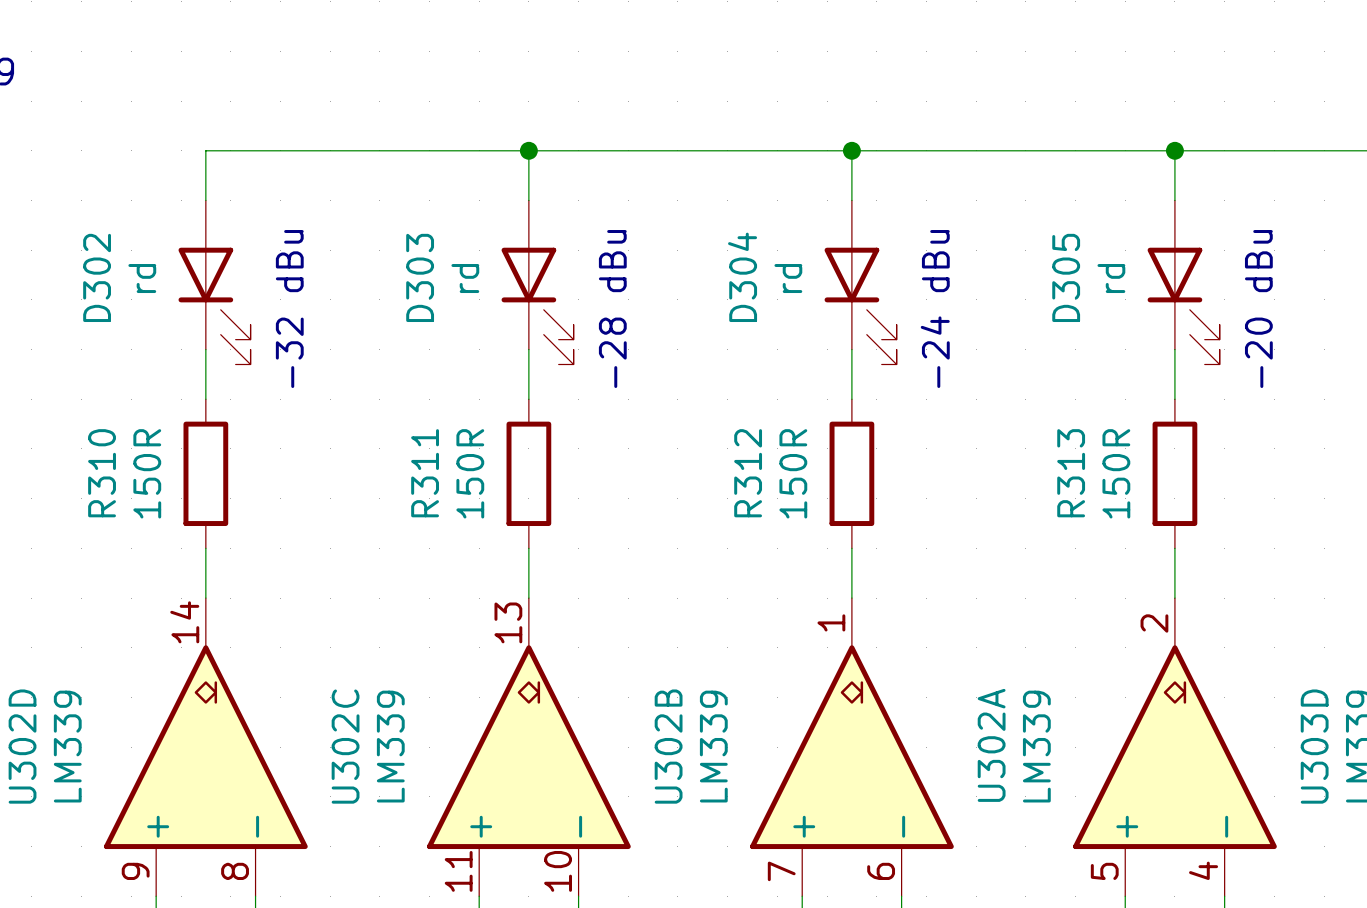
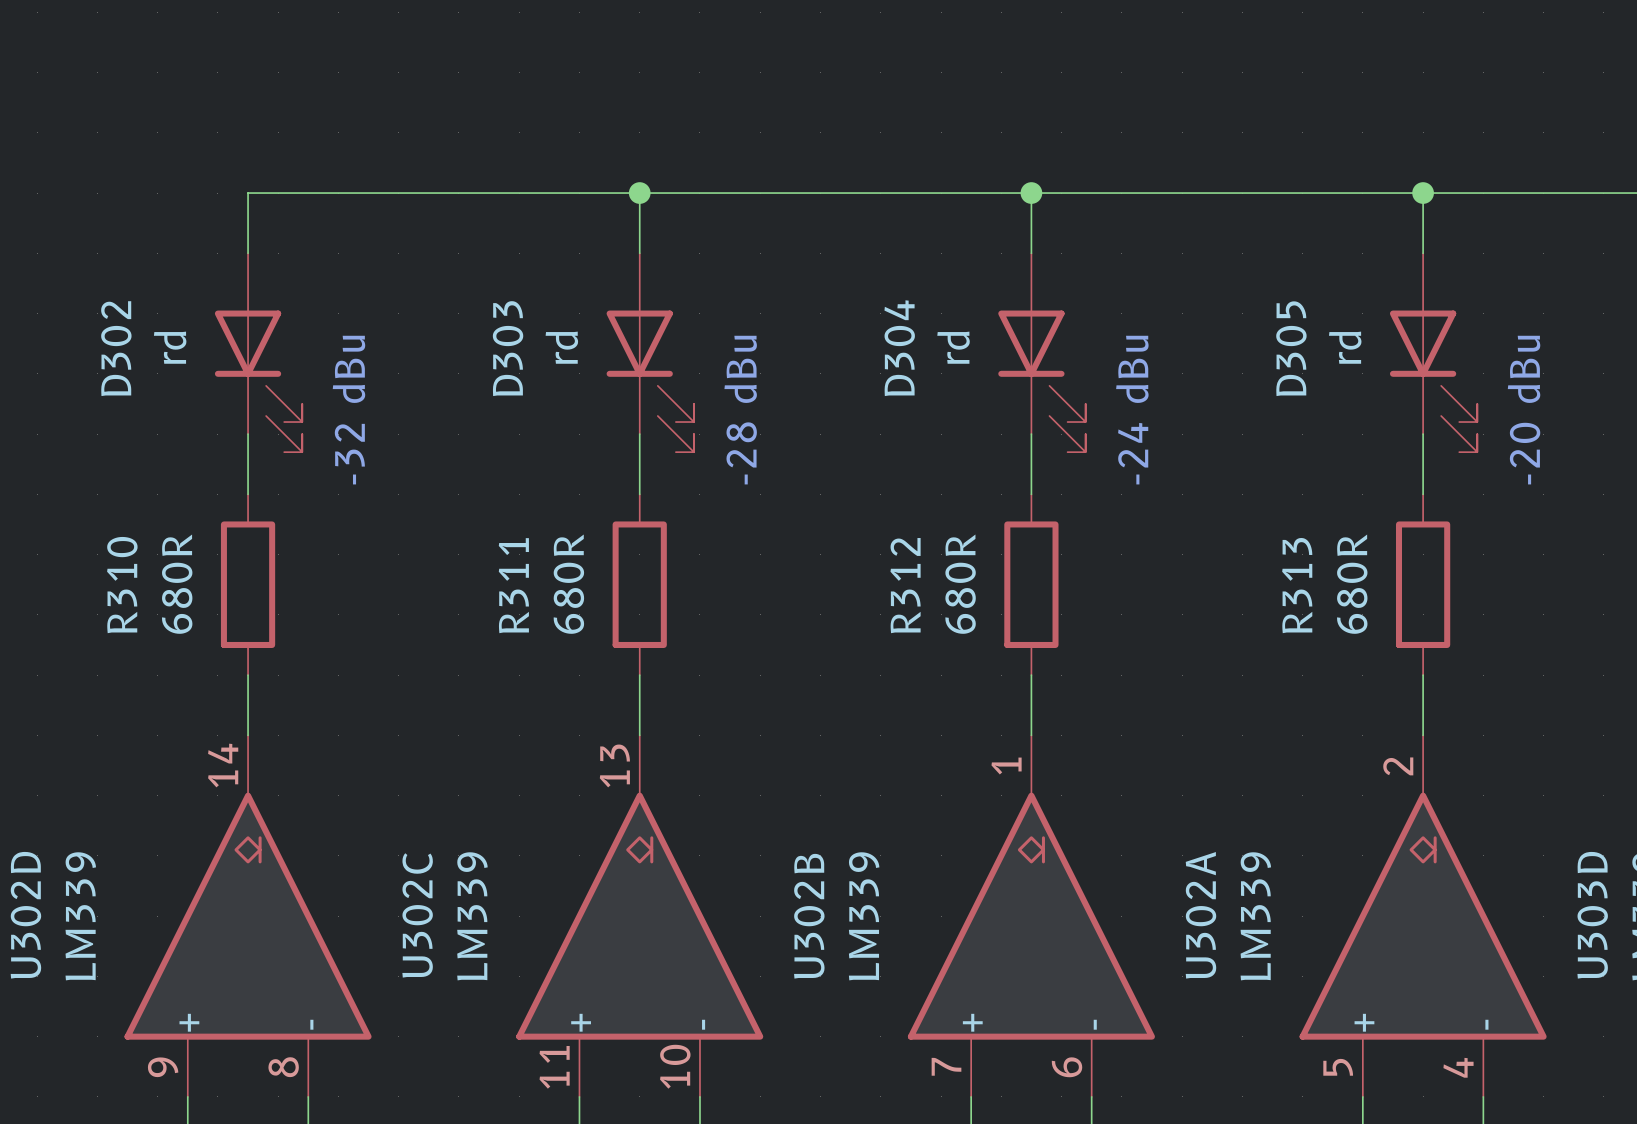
R310 value: 150R (147, 473) -> 680R (177, 584)
R311 value: 150R (470, 473) -> 680R (568, 584)
R312 value: 150R (793, 473) -> 680R (960, 584)
R313 value: 150R (1116, 473) -> 680R (1352, 584)

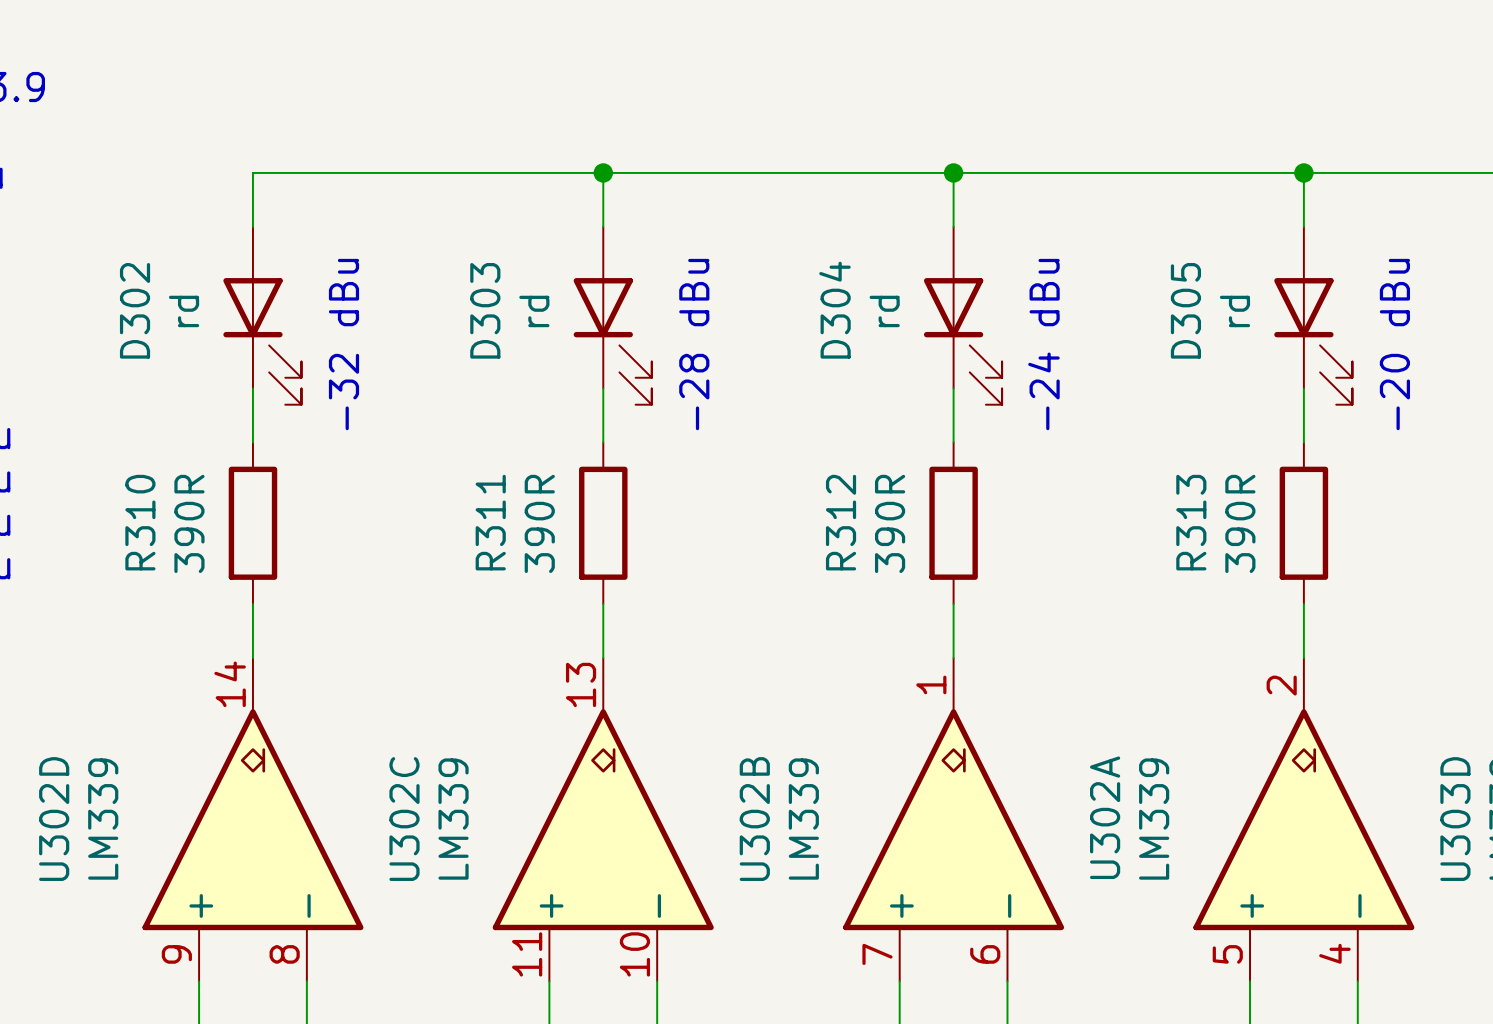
R310 value: 680R (177, 584) -> 390R (189, 523)
R311 value: 680R (568, 584) -> 390R (539, 523)
R312 value: 680R (960, 584) -> 390R (890, 523)
R313 value: 680R (1352, 584) -> 390R (1240, 523)

